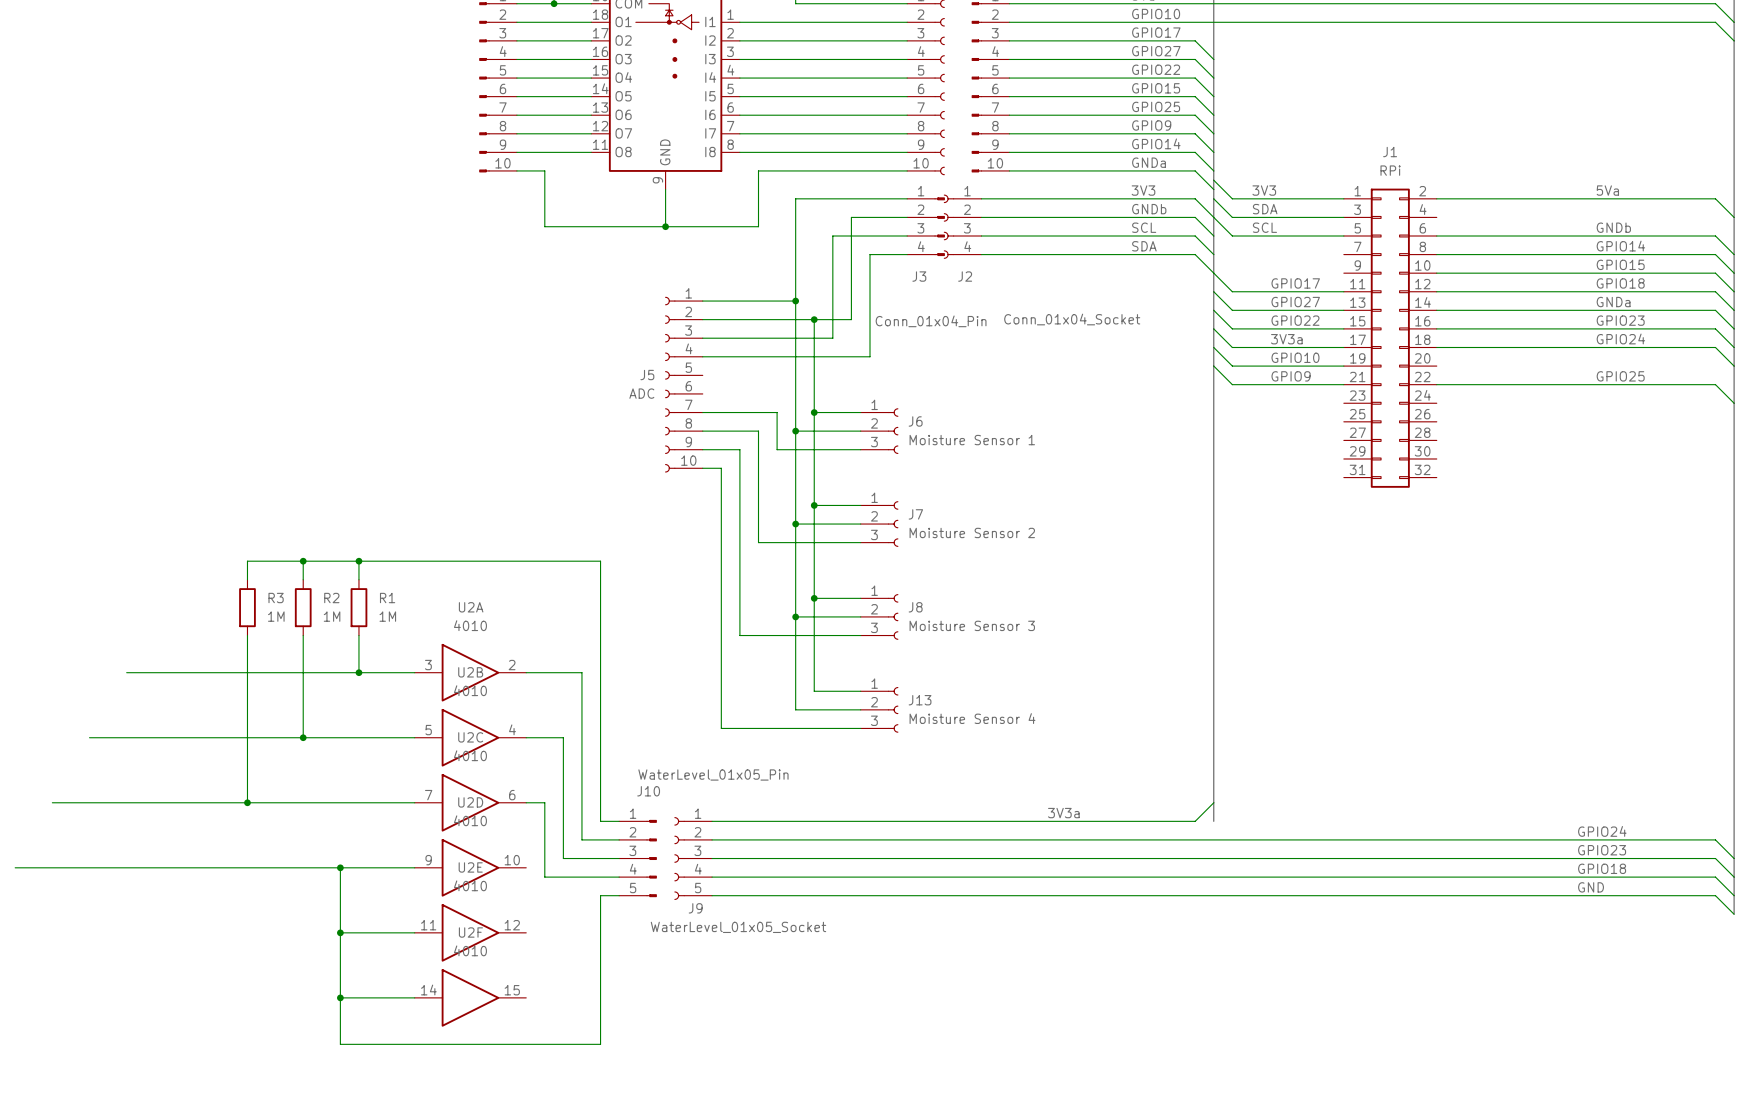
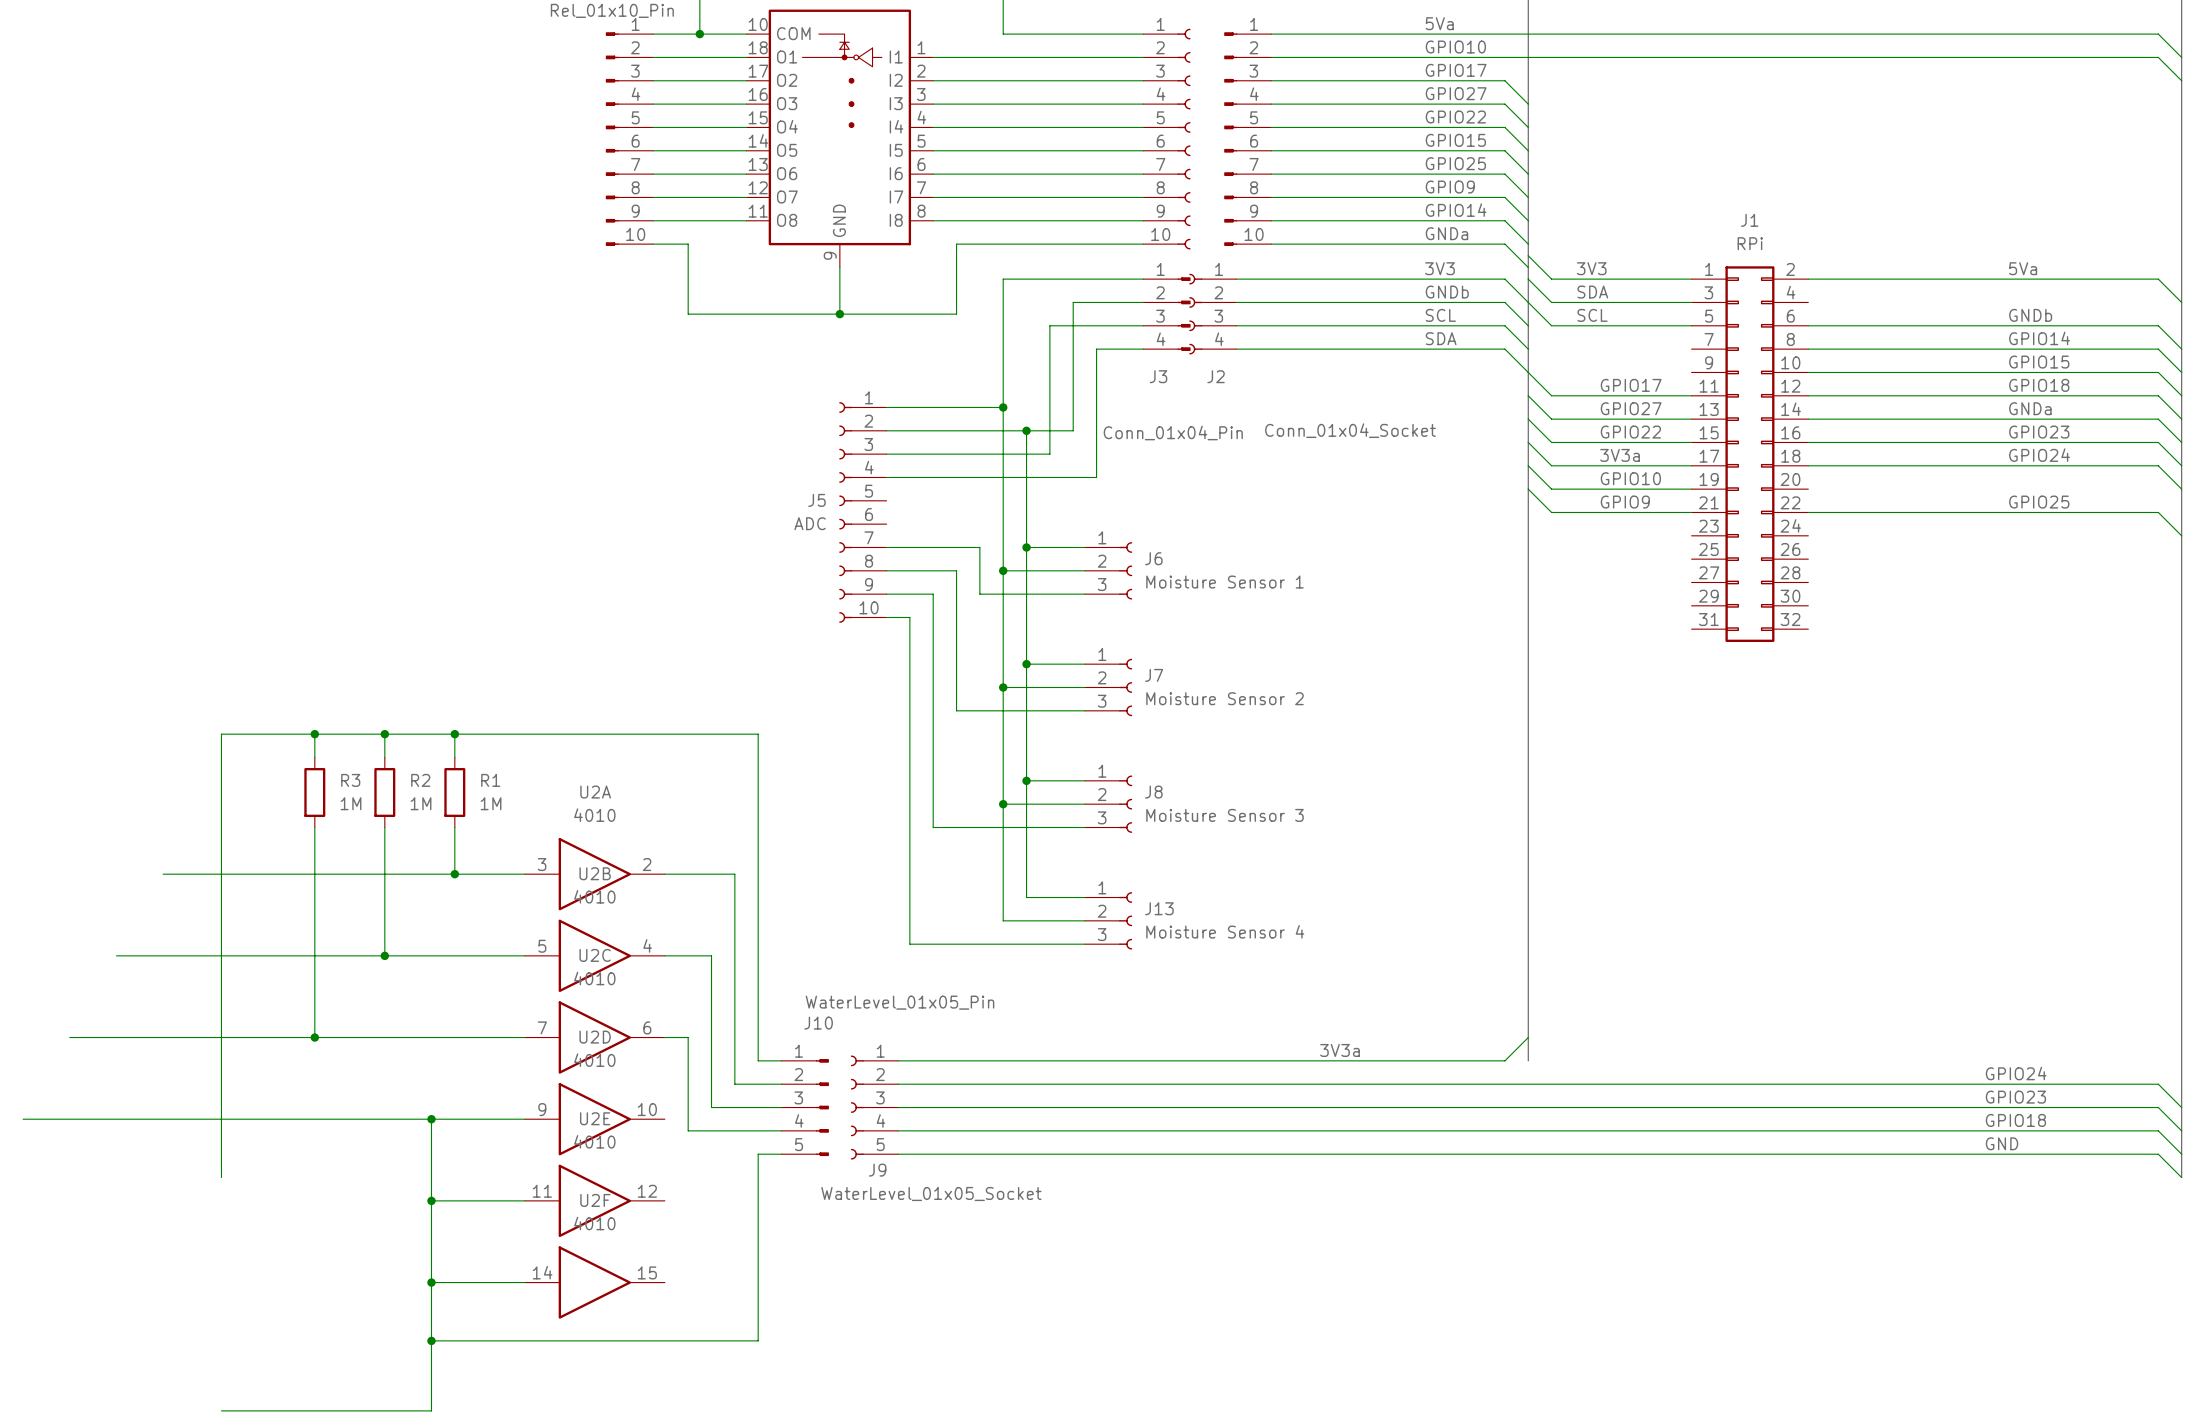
wire: none -> (314, 734) (221, 734) (221, 1177)
junction: none -> (314, 734)
wire: none -> (431, 1340) (431, 1410) (221, 1410)
junction: none -> (431, 1340)

